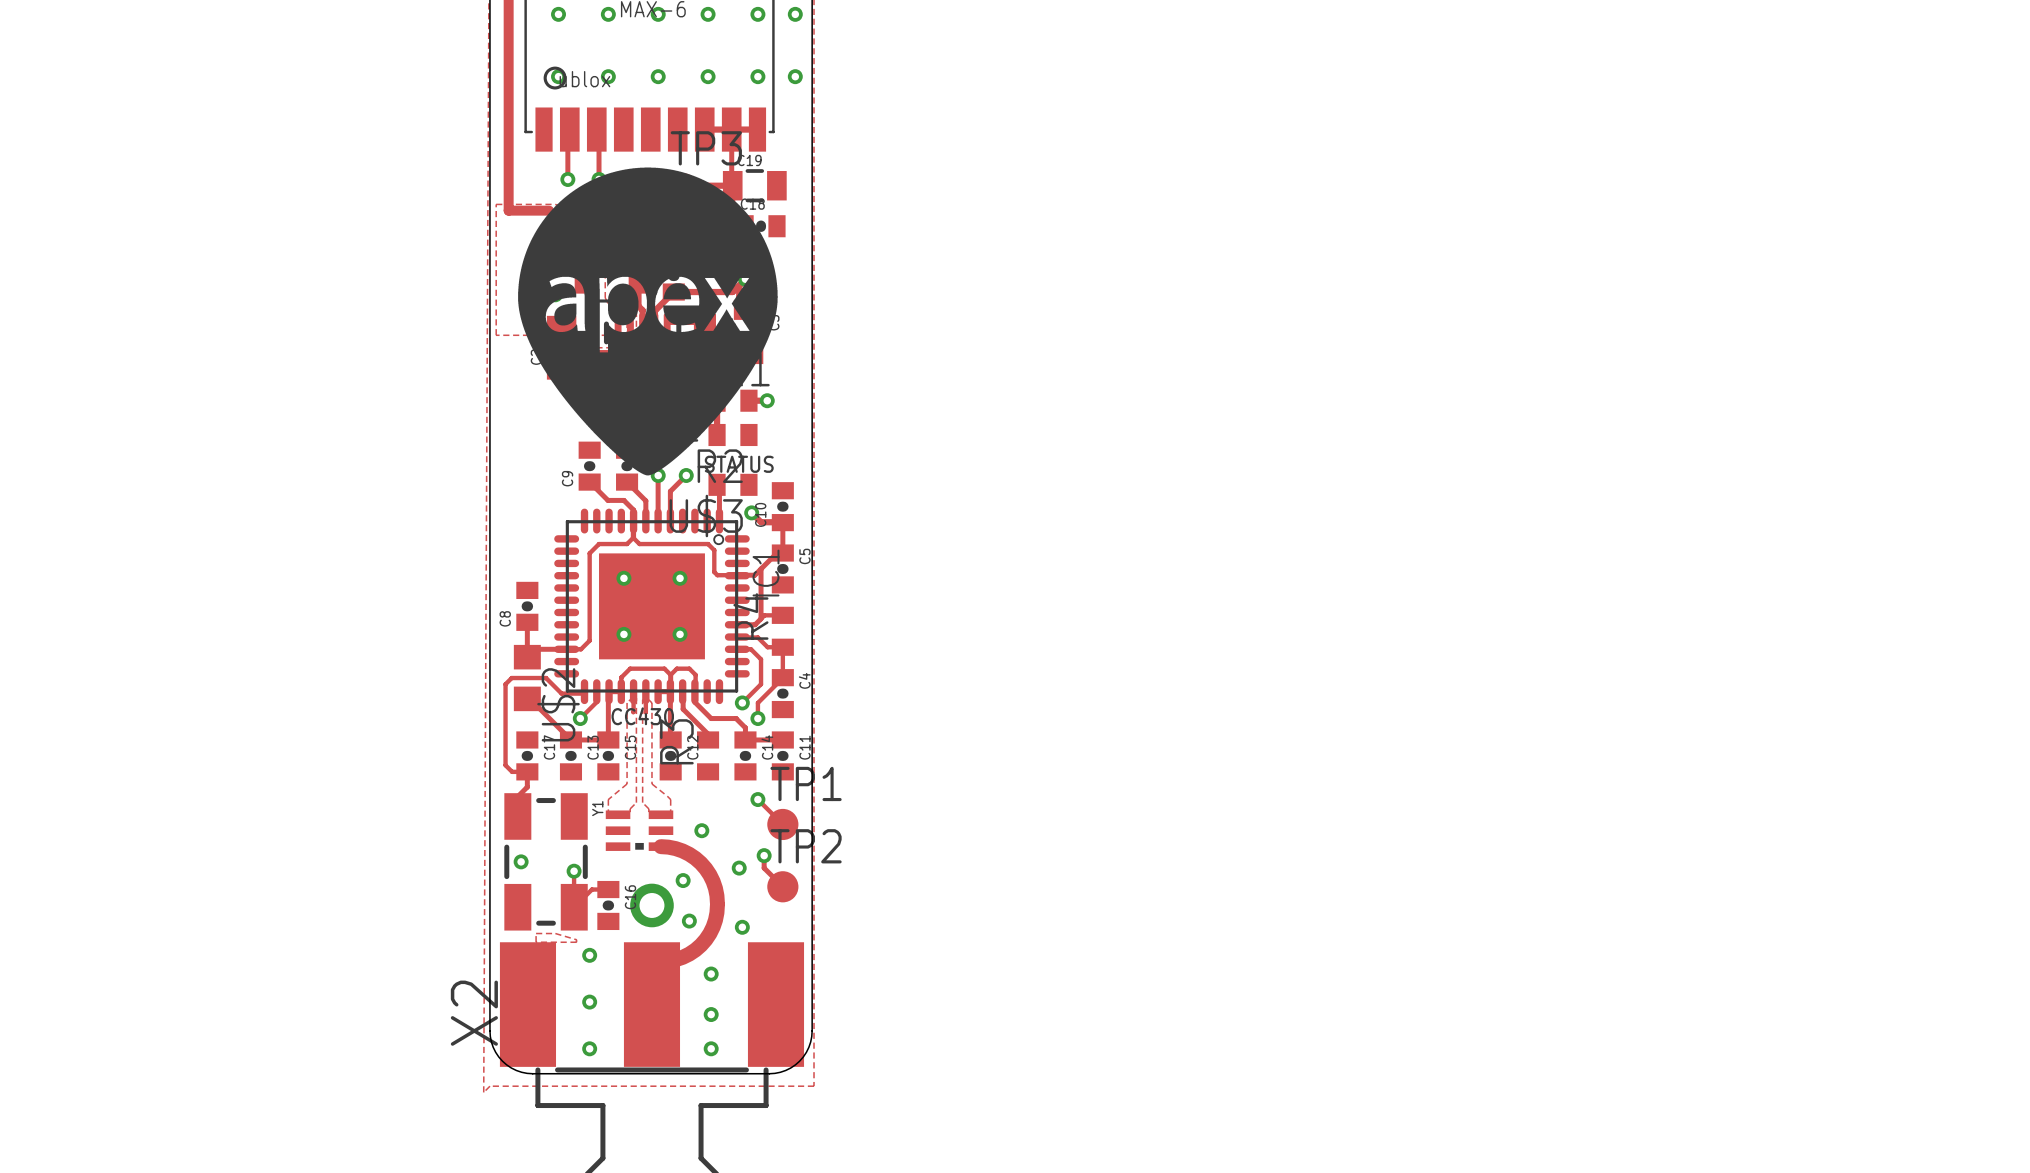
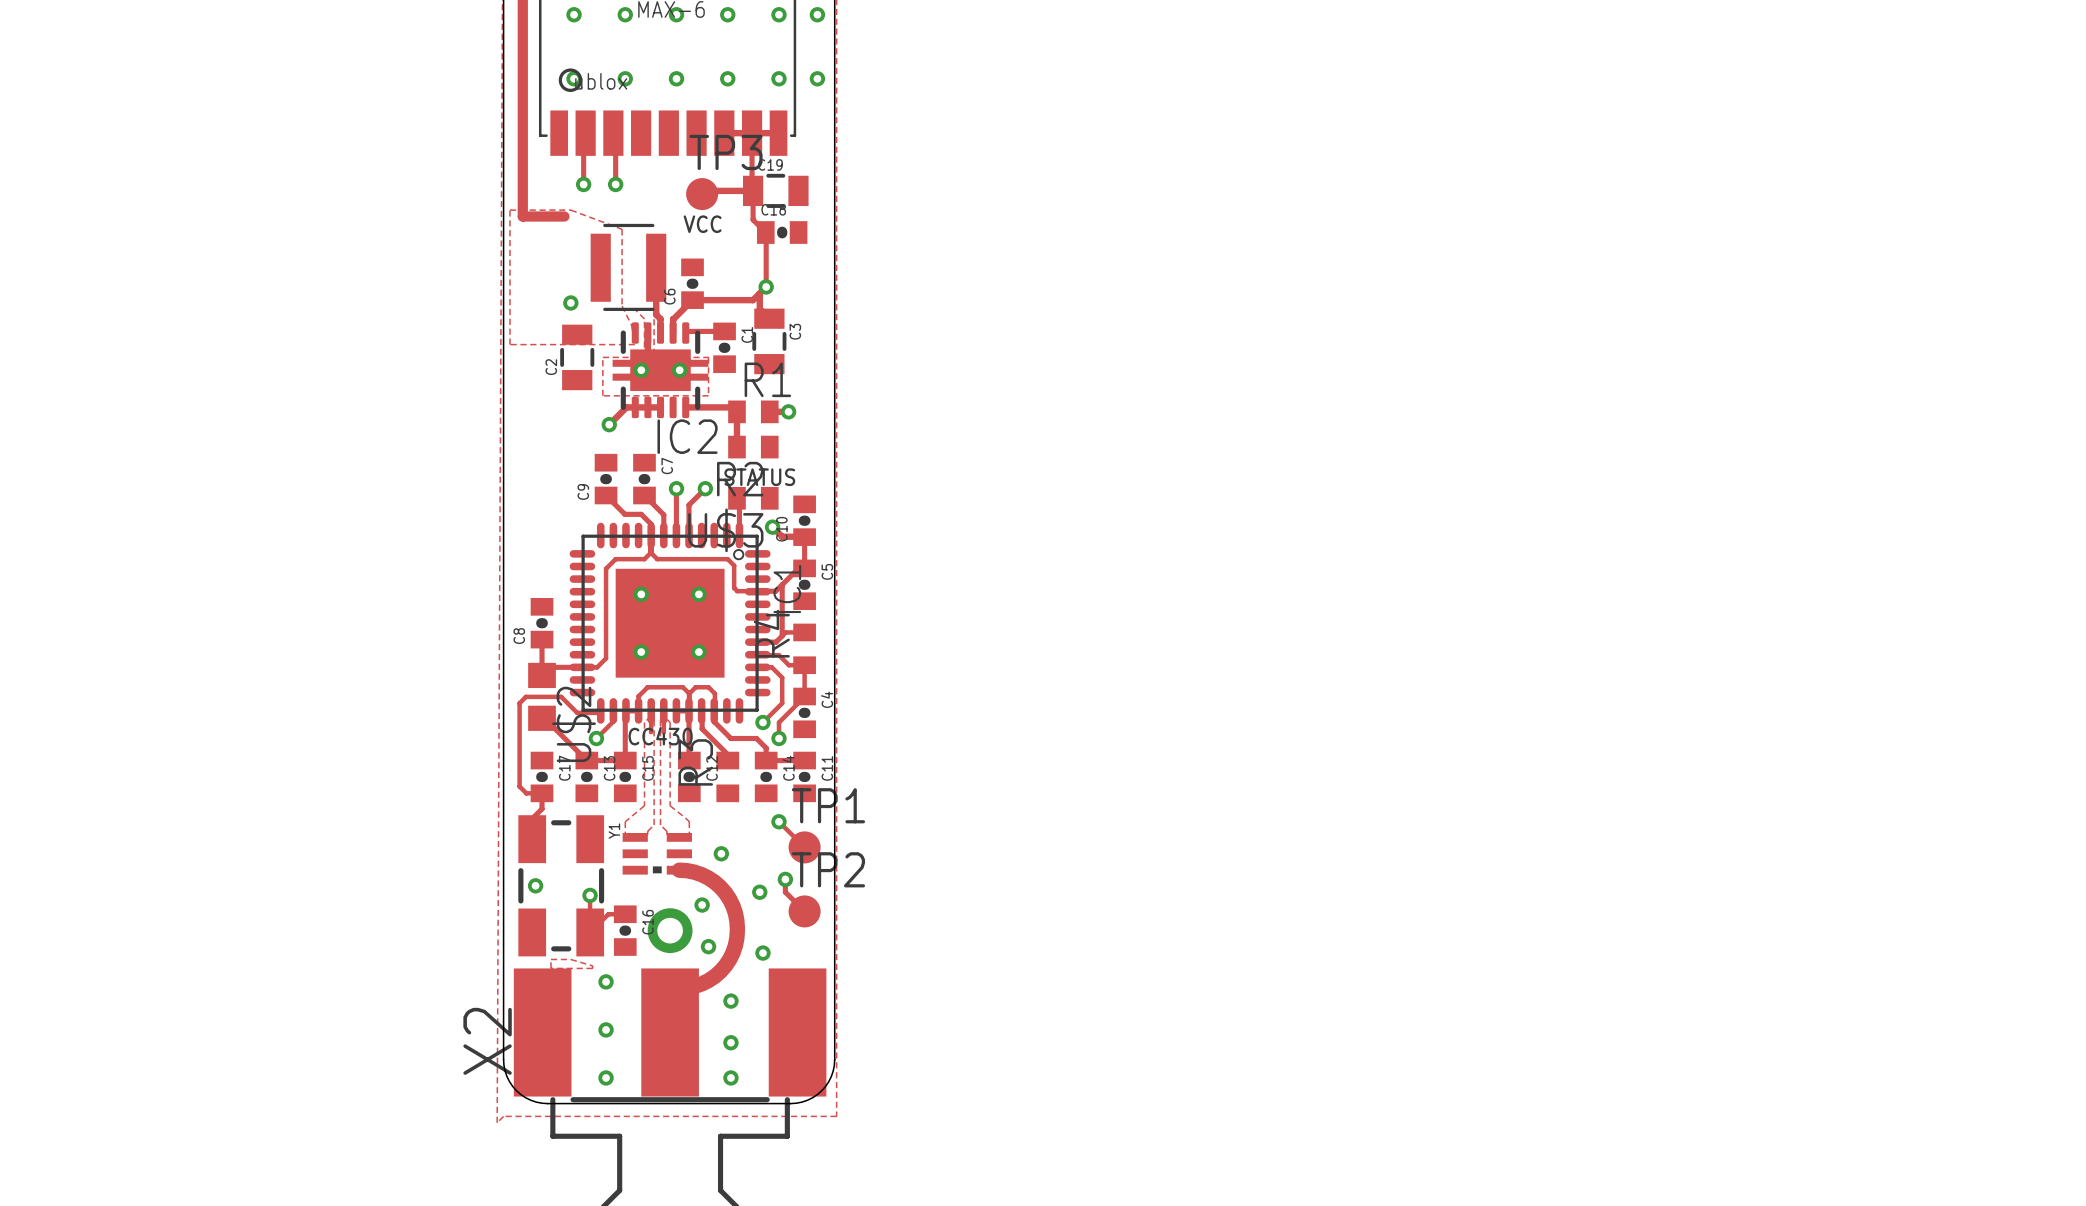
drawing: [518, 167, 778, 476] -> none

